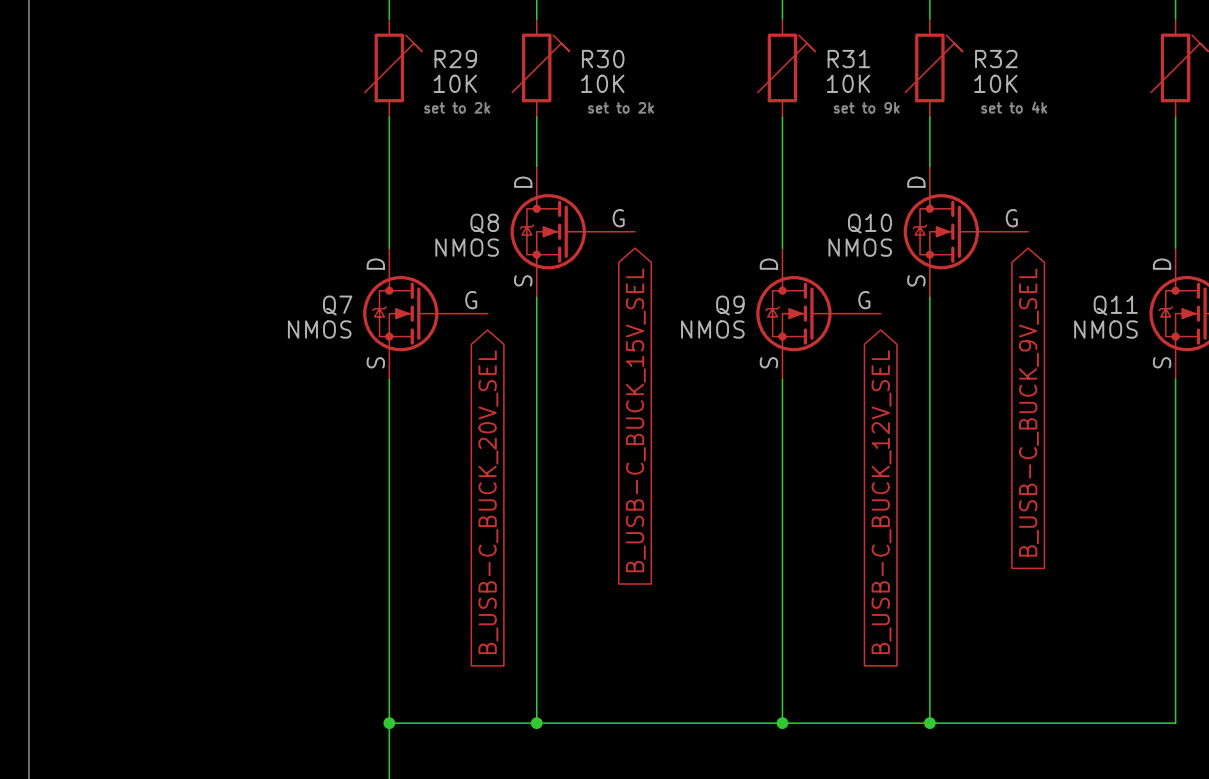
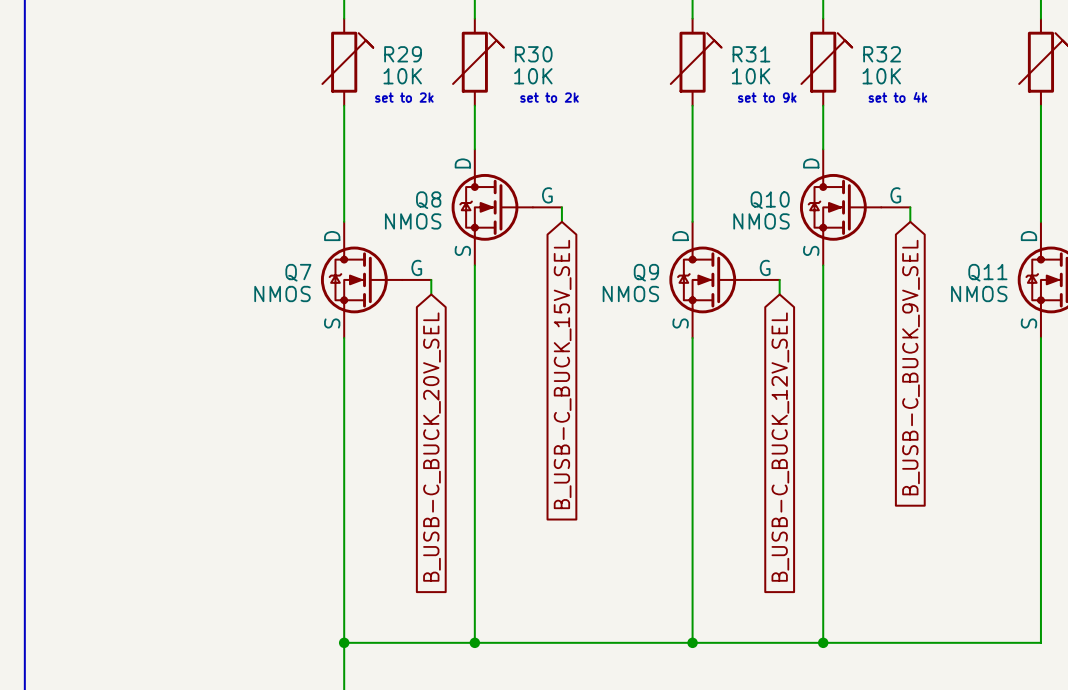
wire: none -> (561, 207) (561, 221)
wire: none -> (910, 207) (910, 221)
wire: none -> (431, 279) (431, 294)
wire: none -> (779, 279) (779, 294)

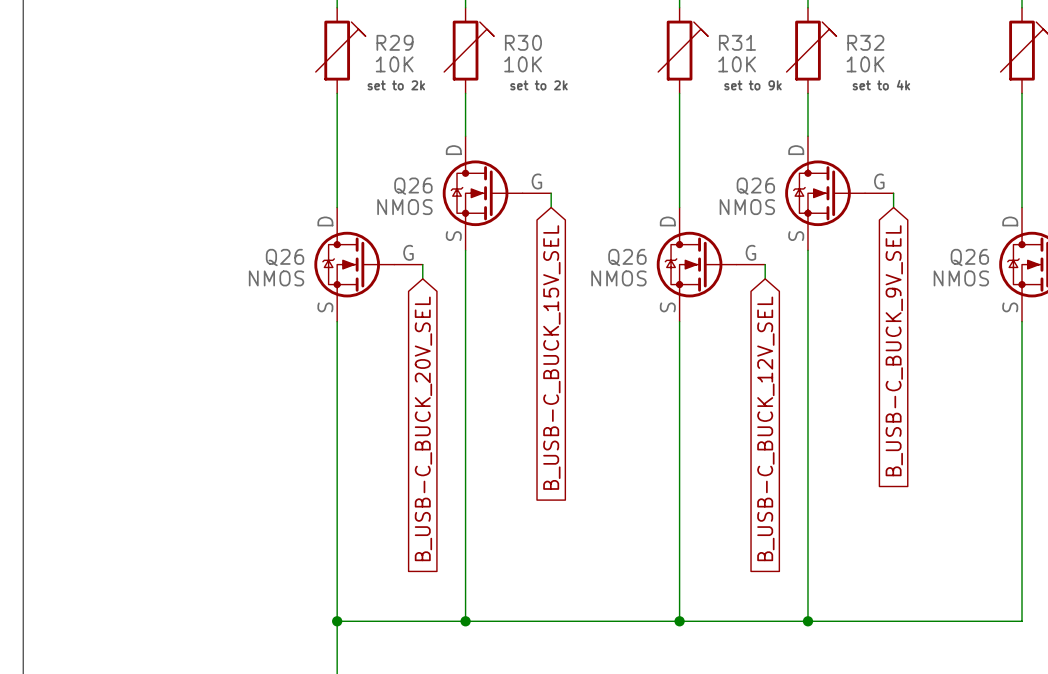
Q8 name: Q8 (428, 200) -> Q26 (413, 186)
Q10 name: Q10 (770, 200) -> Q26 (755, 186)
Q7 name: Q7 (298, 272) -> Q26 (285, 257)
Q9 name: Q9 (646, 272) -> Q26 (627, 257)
Q11 name: Q11 (987, 272) -> Q26 (969, 257)

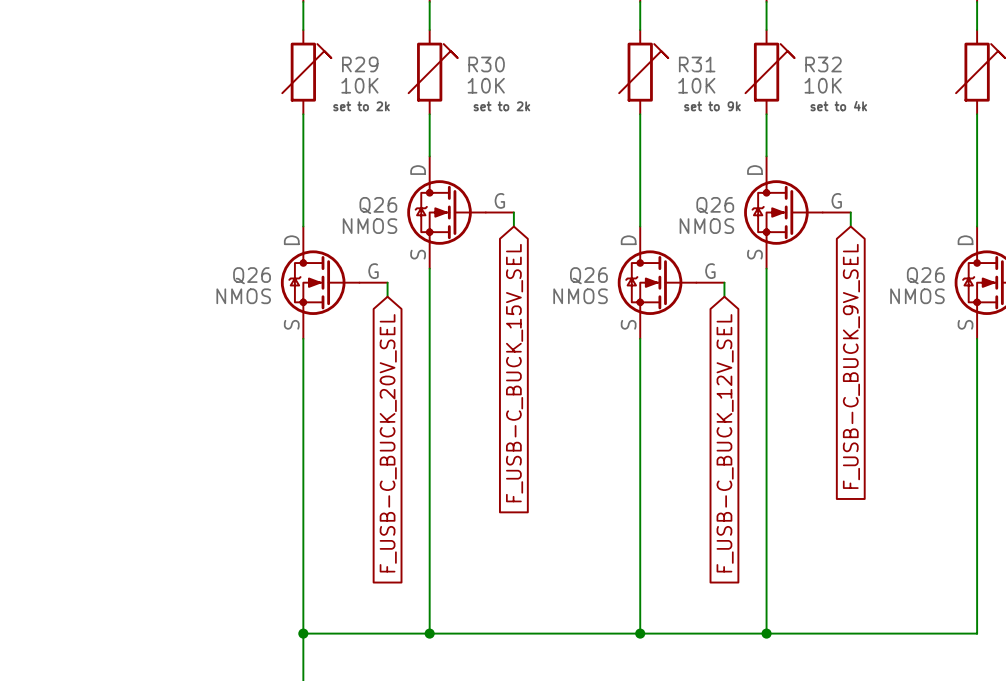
global label: B_USB-C_BUCK_9V_SEL (894, 350) -> F_USB-C_BUCK_9V_SEL (851, 366)
global label: B_USB-C_BUCK_15V_SEL (551, 357) -> F_USB-C_BUCK_15V_SEL (514, 373)
global label: B_USB-C_BUCK_20V_SEL (423, 428) -> F_USB-C_BUCK_20V_SEL (388, 443)
global label: B_USB-C_BUCK_12V_SEL (765, 428) -> F_USB-C_BUCK_12V_SEL (725, 443)

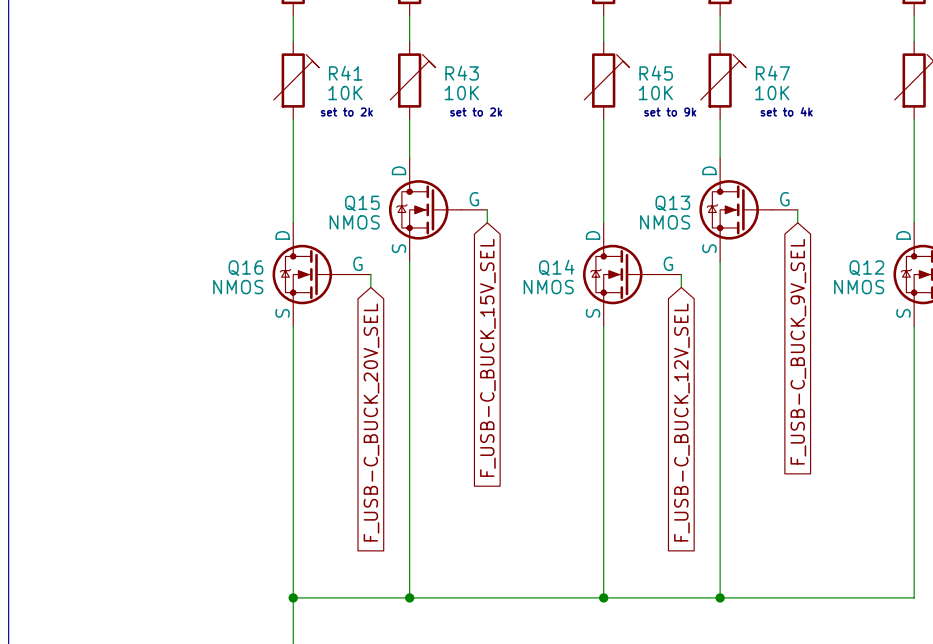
R29 name: R29 (360, 64) -> R41 (345, 73)
R30 name: R30 (486, 64) -> R43 (462, 73)
R31 name: R31 (697, 64) -> R45 (656, 73)
R32 name: R32 (823, 64) -> R47 (772, 73)
Q26 name: Q26 (378, 205) -> Q15 (362, 203)
Q26 name: Q26 (715, 205) -> Q13 (672, 203)
Q26 name: Q26 (252, 275) -> Q16 (245, 268)
Q26 name: Q26 (588, 275) -> Q14 (556, 267)
Q26 name: Q26 (925, 275) -> Q12 (866, 268)

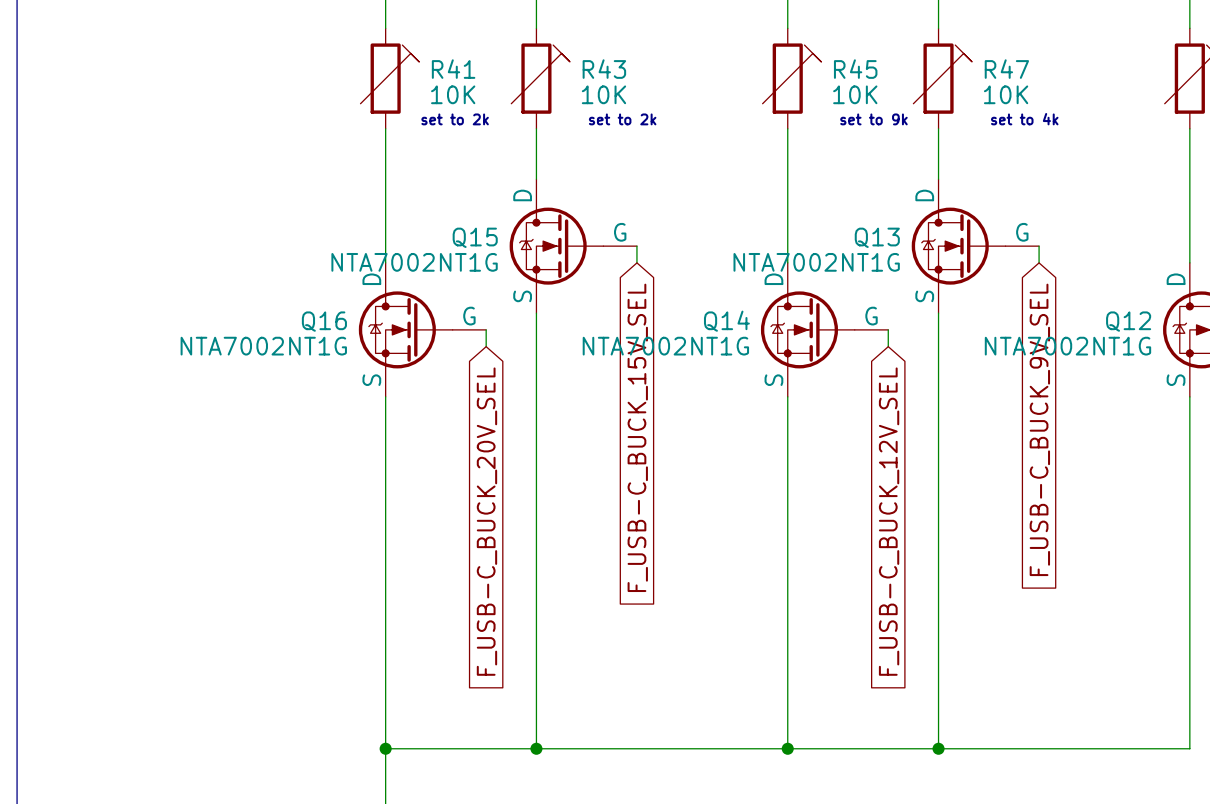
Q15 value: NMOS (354, 222) -> NTA7002NT1G (414, 262)
Q13 value: NMOS (665, 222) -> NTA7002NT1G (816, 262)
Q16 value: NMOS (238, 287) -> NTA7002NT1G (263, 346)
Q14 value: NMOS (548, 287) -> NTA7002NT1G (665, 346)
Q12 value: NMOS (859, 287) -> NTA7002NT1G (1067, 346)

